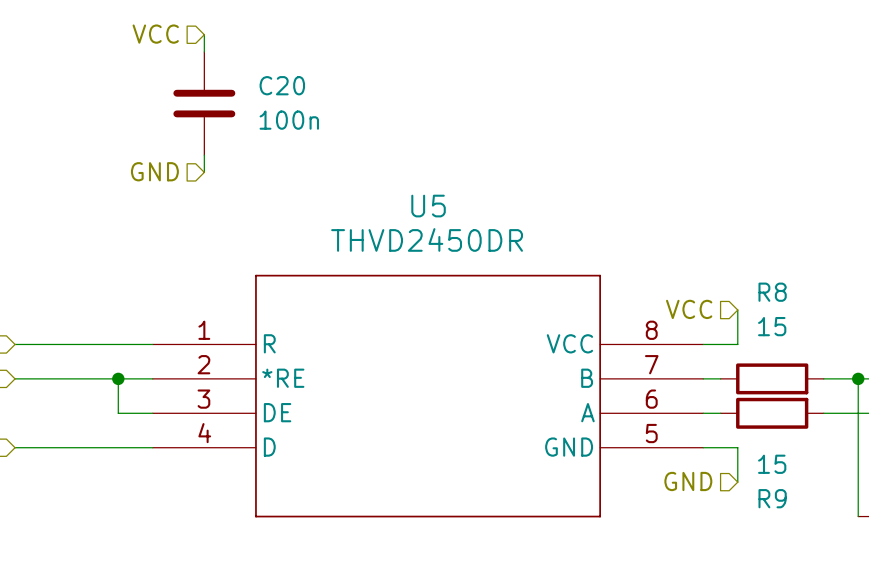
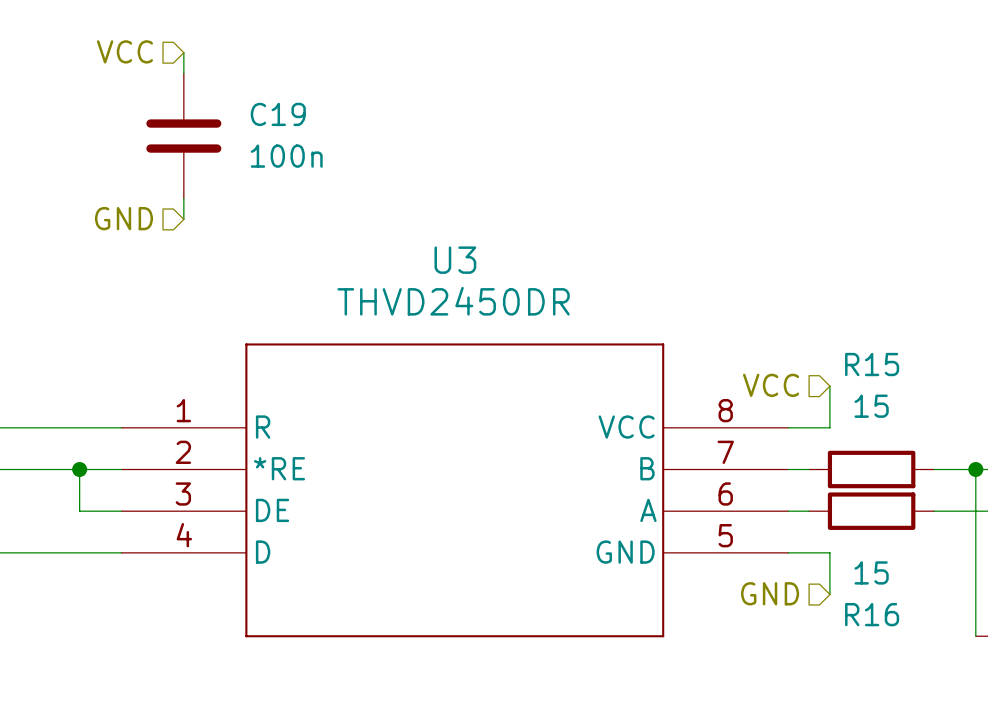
C20 name: C20 (282, 85) -> C19 (278, 114)
U5 name: U5 (428, 206) -> U3 (455, 260)
R8 name: R8 (772, 292) -> R15 (872, 364)
R9 name: R9 (772, 498) -> R16 (872, 614)

